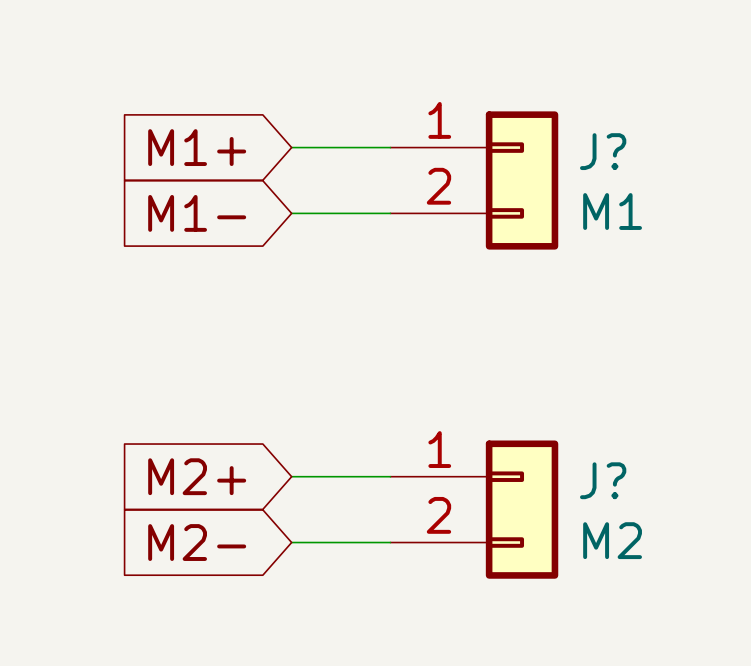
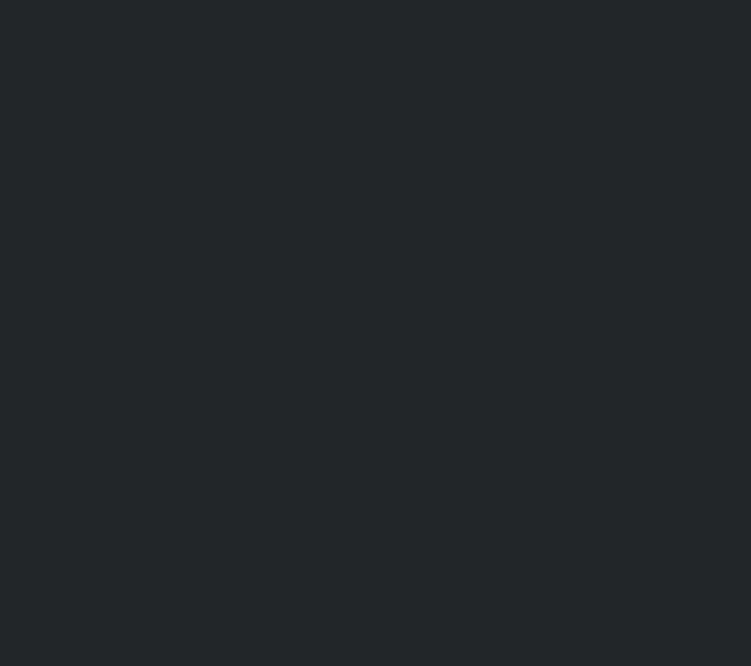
global label: M1+ (197, 147) -> none
wire: (291, 147) (390, 147) -> none
J?: M1 (474, 180) -> none
global label: M1- (197, 213) -> none
wire: (291, 213) (390, 213) -> none
global label: M2+ (197, 476) -> none
wire: (291, 476) (390, 476) -> none
J?: M2 (474, 509) -> none
global label: M2- (197, 542) -> none
wire: (291, 542) (390, 542) -> none

